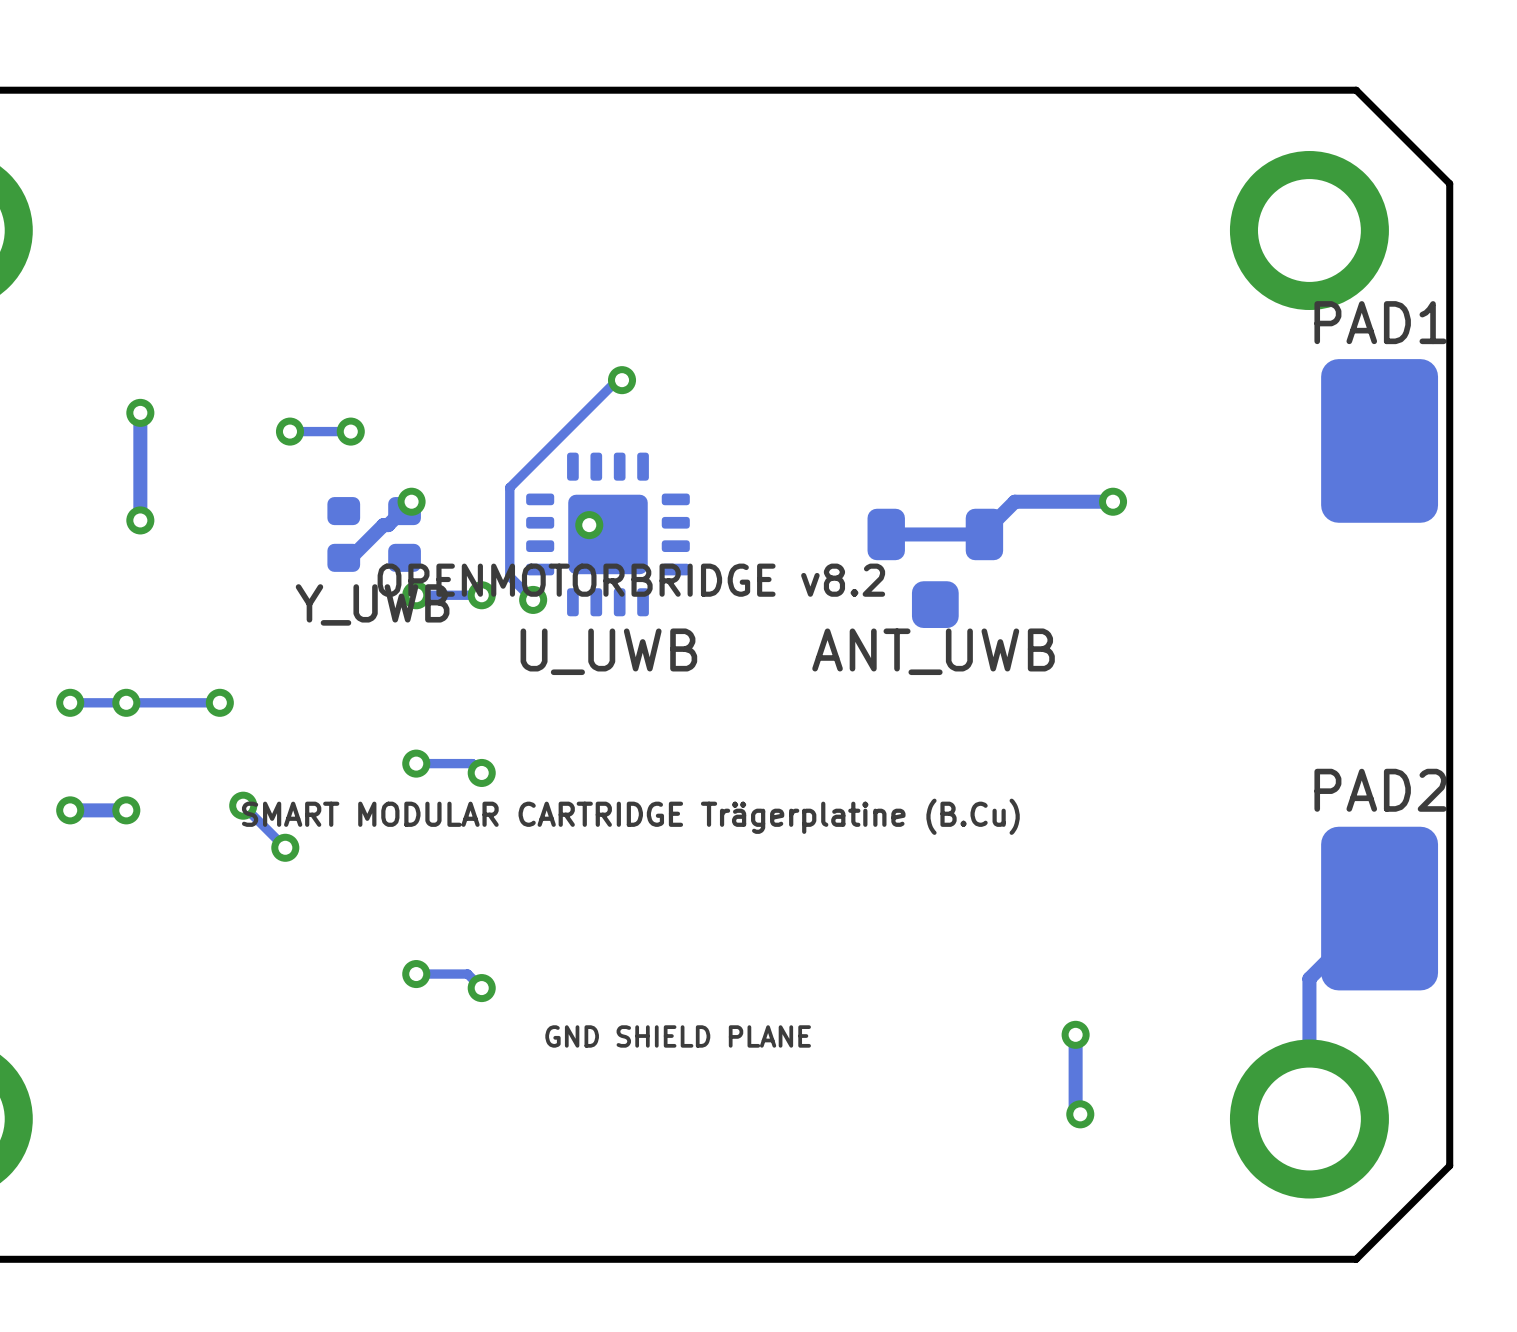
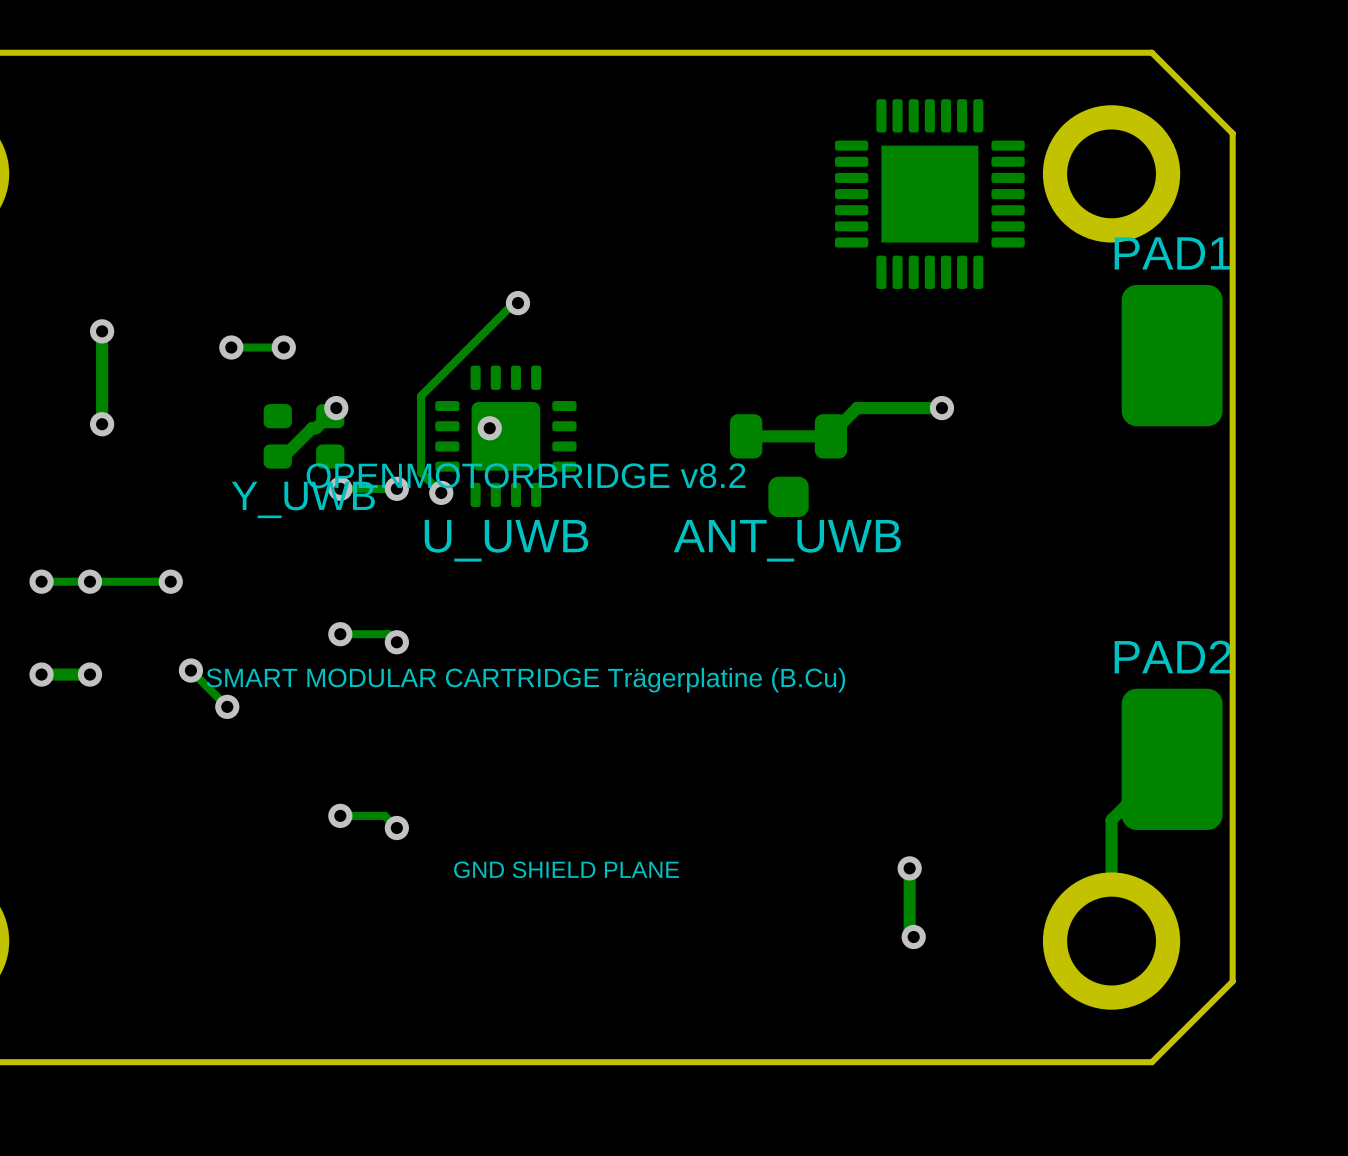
part: none -> (929, 194)

